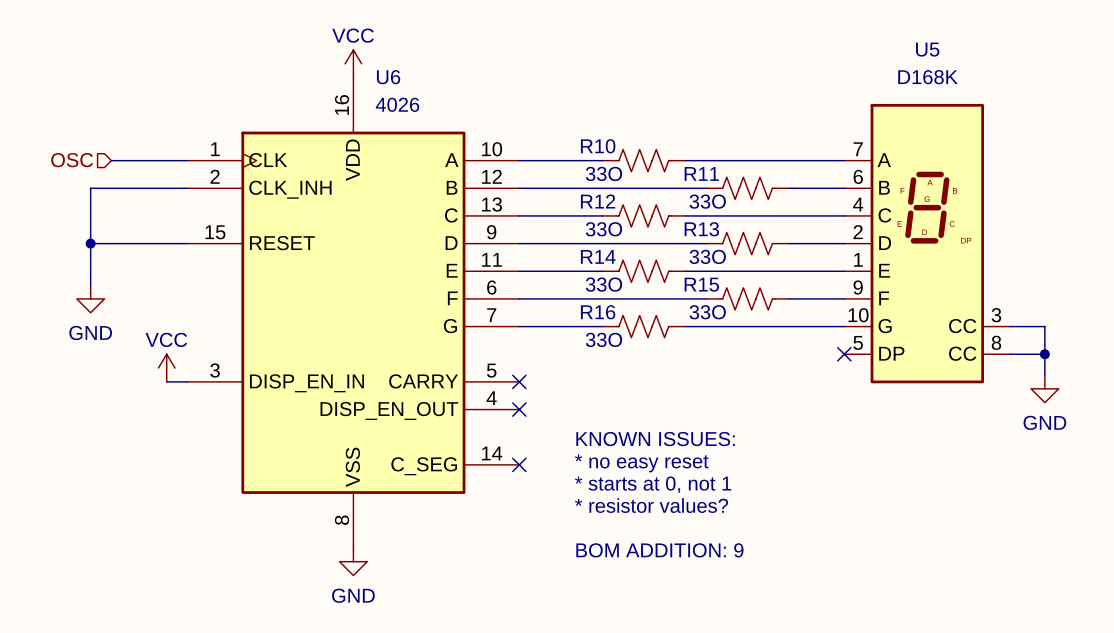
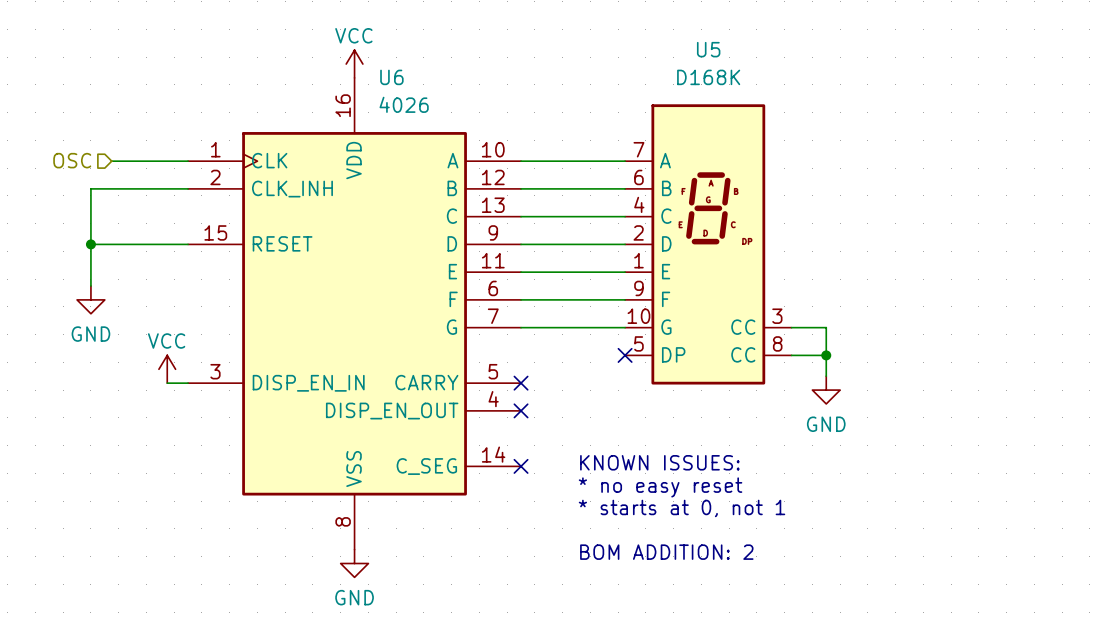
R10: 33O (643, 160) -> none
wire: (685, 160) (844, 160) -> none
R11: 33O (747, 188) -> none
wire: (789, 188) (844, 188) -> none
R12: 33O (643, 215) -> none
wire: (685, 215) (844, 215) -> none
R13: 33O (747, 243) -> none
wire: (789, 243) (844, 243) -> none
U5 position: (927, 243) -> (708, 244)
R14: 33O (643, 271) -> none
wire: (685, 271) (844, 271) -> none
R15: 33O (747, 298) -> none
wire: (789, 298) (844, 298) -> none
R16: 33O (643, 326) -> none
wire: (823, 326) (844, 326) -> (826, 327) (826, 376)
wire: (1010, 326) (1044, 326) (1044, 375) -> none
no-connect mark: none -> (625, 355)
junction: none -> (826, 355)
no-connect mark: (844, 354) -> none
wire: (1010, 354) (1044, 354) -> (791, 355) (826, 355)
junction: (1044, 354) -> none
power symbol position: GND (1044, 388) -> GND (826, 390)
text: KNOWN ISSUES: (655, 439) -> none
text: * no easy reset (641, 463) -> KNOWN ISSUES: (659, 462)
text: * starts at 0, not 1 (653, 484) -> * no easy reset (660, 487)
text: * resistor values? (651, 505) -> * starts at 0, not 1 (682, 508)
text: BOM ADDITION: 9 (659, 550) -> BOM ADDITION: 2 (666, 552)

